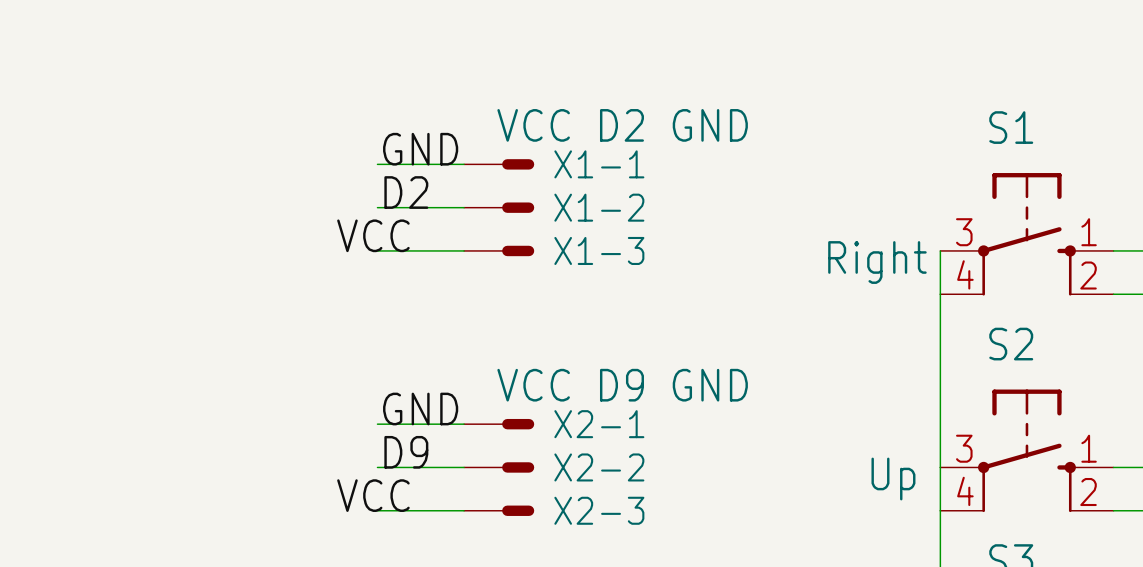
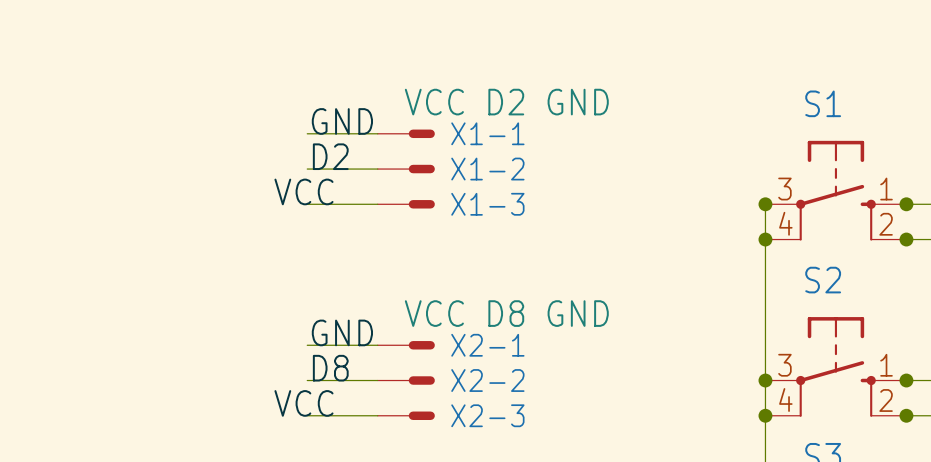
junction: none -> (765, 204)
junction: none -> (906, 204)
S1 value: Right (877, 262) -> none
junction: none -> (765, 239)
junction: none -> (906, 239)
X2-1 value: VCC D9 GND (622, 385) -> VCC D8 GND (506, 313)
label: D9 (406, 452) -> D8 (330, 368)
junction: none -> (765, 380)
junction: none -> (906, 380)
S2 value: Up (893, 479) -> none
junction: none -> (765, 415)
junction: none -> (906, 415)

